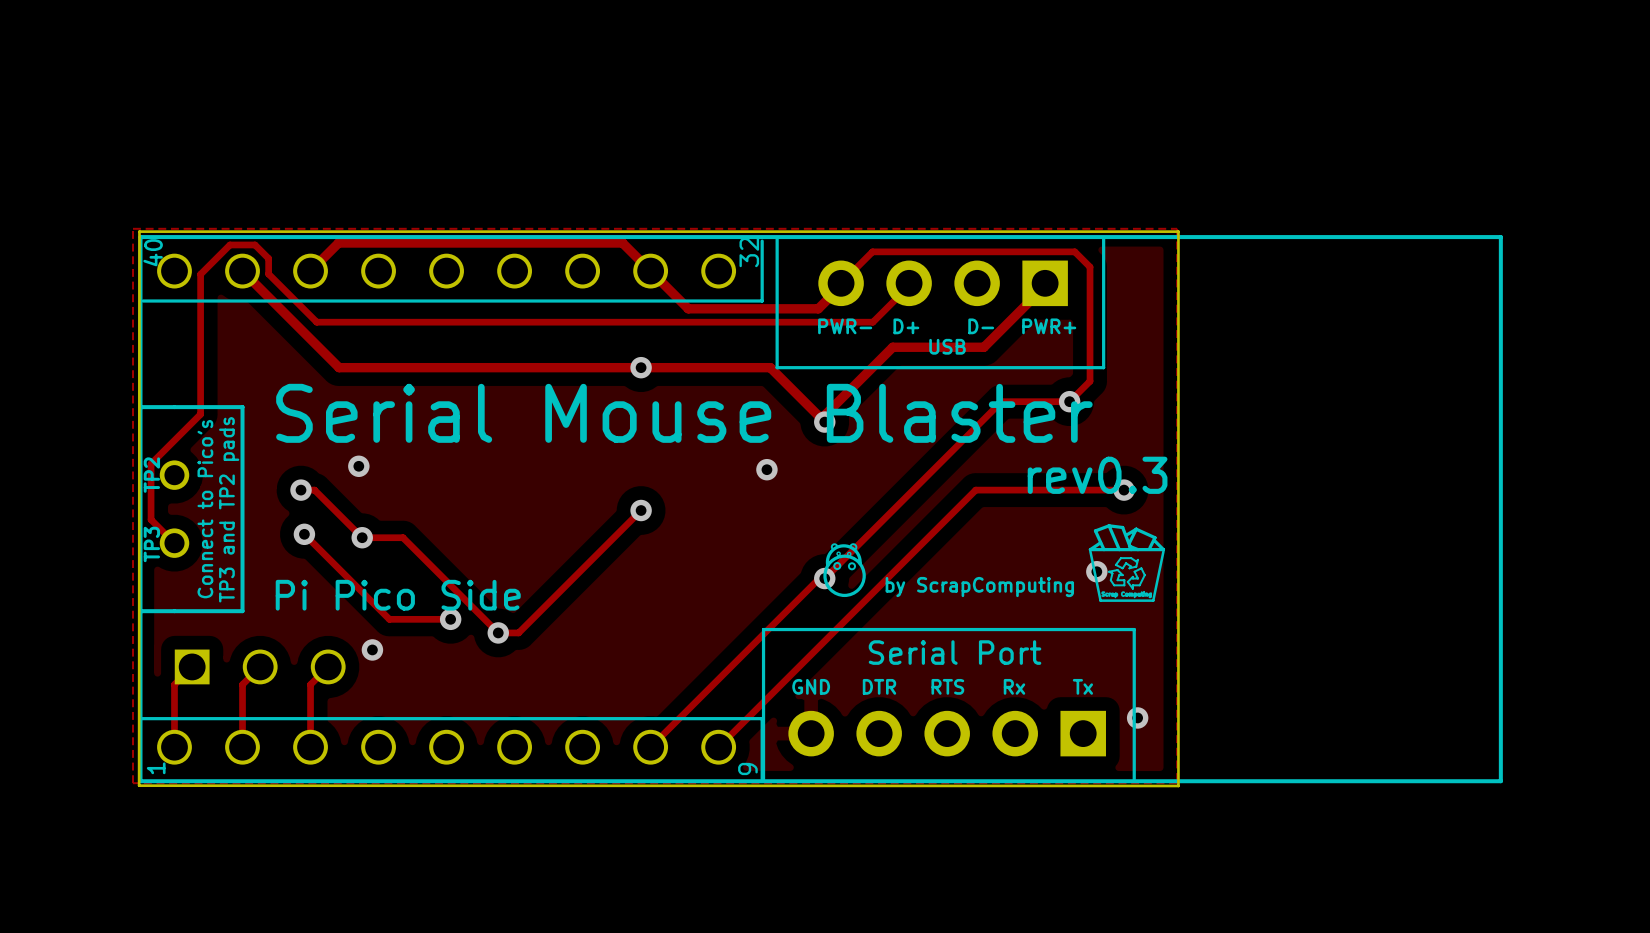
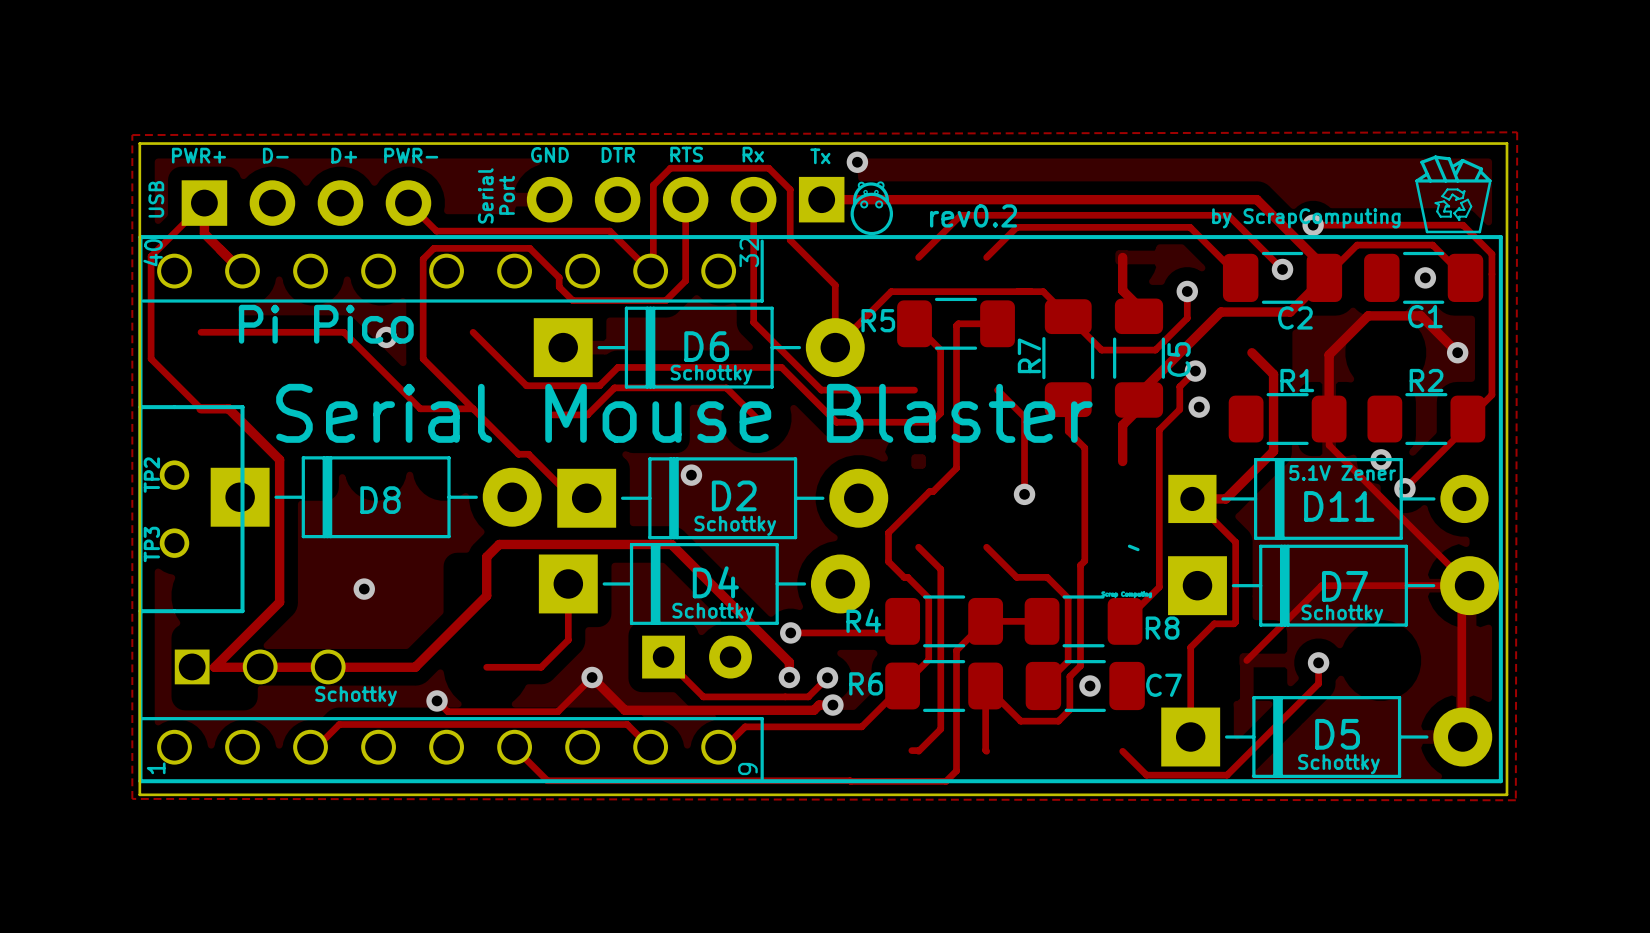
text: none -> PWR+ (198, 155)
text: none -> D- (275, 155)
via: none -> (857, 162)
drawing: none -> [860, 189, 884, 209]
text: none -> Serial (485, 195)
text: none -> Port (507, 195)
text: none -> USB (156, 199)
track: none -> (685, 199) (685, 280) (665, 300) (572, 300) (559, 287) (559, 277) (529, 248) (433, 248) (423, 259) (423, 358) (518, 454) (528, 454) (582, 507) (586, 507)
track: none -> (753, 199) (753, 322) (821, 390) (914, 390)
track: none -> (821, 199) (1256, 199) (1324, 267) (1324, 277)
track: none -> (408, 203) (436, 231) (609, 231) (653, 274) (653, 185) (670, 168) (768, 168) (790, 189) (790, 240) (835, 285) (835, 347) (891, 291) (1043, 291) (1101, 350) (1155, 350) (1187, 318) (1187, 291)
text: none -> rev0.2 (973, 215)
track: none -> (1313, 225) (1463, 225) (1491, 254) (1491, 394) (1467, 419) (1467, 425) (1404, 488)
via: none -> (1313, 225)
zone outline: (133, 228) (133, 783) (1177, 783) (1177, 228) (133, 228) -> (1517, 132) (132, 135) (132, 798) (1515, 800) (1517, 132)
board edge: (139, 231) (1178, 231) (1178, 785) (139, 785) (139, 231) -> (139, 143) (139, 794) (1506, 794) (1506, 143) (139, 143)
line: (777, 238) (777, 367) (1103, 367) (1103, 238) -> none
track: none -> (918, 257) (960, 215) (1228, 215) (1282, 269)
track: none -> (986, 257) (1016, 227) (1190, 227) (1240, 277)
track: none -> (1122, 257) (1122, 290) (1142, 310)
via: none -> (1282, 269)
track: (242, 271) (339, 367) (770, 367) (824, 422) (824, 415) (892, 347) (983, 347) (1045, 286) -> none
track: (310, 271) (338, 243) (622, 243) (688, 308) (818, 308) (841, 286) -> none
track: none -> (245, 274) (204, 233) (204, 203) (151, 256) (151, 358) (201, 408) (228, 408) (279, 459) (279, 602) (214, 667) (415, 667) (486, 595) (486, 557) (499, 544) (671, 544) (789, 662) (789, 677)
C2: none -> (1282, 277)
track: none -> (1324, 277) (1357, 245) (1432, 245) (1465, 277)
track: none -> (1324, 277) (1290, 312) (1220, 312) (1139, 393) (1139, 399)
C1: none -> (1423, 277)
via: none -> (1425, 277)
track: (841, 283) (872, 251) (1074, 251) (1090, 267) (1090, 381) (1069, 401) (1001, 401) (824, 578) (819, 578) (650, 747) -> none
part rotation: 0° (943, 283) -> 180° (306, 203)
part position: (943, 283) -> (306, 203)
track: (909, 286) (872, 322) (316, 322) (268, 274) (268, 258) (255, 244) (229, 244) (200, 274) (200, 414) (151, 463) (151, 519) (174, 543) -> none
via: none -> (1187, 291)
R5: none -> (956, 323)
track: none -> (997, 323) (958, 323) (956, 325) (956, 468) (933, 491) (929, 491) (888, 532) (888, 561) (928, 598) (928, 659) (861, 726) (745, 726) (721, 750)
text: none -> Pi Pico (326, 324)
track: none -> (914, 324) (940, 349) (940, 413) (931, 422) (836, 422) (781, 367) (617, 367) (599, 385) (526, 385) (473, 332)
text position: PWR- (845, 326) -> PWR- (411, 155)
text position: D+ (906, 326) -> D+ (344, 155)
text: D- (981, 326) -> none
text: PWR+ (1049, 326) -> none
track: none -> (201, 332) (343, 332) (420, 408) (473, 408)
via: none -> (386, 337)
text: USB (947, 346) -> none
D6: none -> (699, 347)
track: none -> (1251, 352) (1273, 374) (1273, 451) (1225, 498) (1192, 498) (1235, 542) (1235, 622) (1233, 623) (1214, 623) (1190, 647) (1190, 737) (1178, 737)
track: none -> (1457, 352) (1420, 315) (1368, 315) (1329, 354) (1329, 445) (1469, 585)
via: none -> (1457, 352)
R7: none -> (1068, 358)
C5: none -> (1139, 358)
via: (641, 367) -> none
track: none -> (1198, 367) (1179, 386) (1179, 409) (1159, 429) (1159, 587) (1125, 621)
via: none -> (1195, 371)
text: none -> Schottky (711, 374)
track: none -> (997, 390) (1024, 417) (1024, 494)
track: none -> (1068, 399) (1068, 431) (1084, 447) (1084, 561) (1080, 565) (1080, 665) (1069, 676) (1069, 709) (1058, 721) (1020, 721) (985, 685) (986, 751)
via: (1069, 401) -> none
track: none -> (1143, 404) (1122, 425) (1122, 461)
via: none -> (1199, 407)
track: none -> (553, 414) (587, 414) (614, 387) (726, 387) (756, 418)
R1: none -> (1287, 419)
R2: none -> (1426, 419)
via: (824, 422) -> none
via: none -> (1381, 459)
via: (358, 466) -> none
via: (766, 469) -> none
text: none -> 5.1V Zener (1342, 472)
via: none -> (691, 475)
text: rev0.3 (1097, 475) -> none
via: none -> (1404, 488)
track: (301, 490) (314, 490) (362, 537) (403, 537) (498, 632) (518, 632) (641, 510) -> none
via: (301, 490) -> none
track: (1124, 490) (975, 490) (718, 747) -> none
via: (1124, 490) -> none
via: none -> (1024, 494)
D8: none -> (376, 497)
D2: none -> (722, 498)
D11: none -> (1328, 498)
text: Connect to Pico's (205, 509) -> none
text: TP3 and TP2 pads (229, 509) -> none
via: (641, 510) -> none
text: none -> Schottky (735, 525)
line: (1109, 525) (1119, 549) -> (1435, 157) (1445, 180)
line: (1109, 525) (1122, 527) (1131, 549) -> (1435, 157) (1449, 158) (1457, 180)
line: (1109, 525) (1095, 530) (1103, 549) -> (1435, 157) (1421, 162) (1430, 180)
line: (1136, 529) (1154, 537) (1149, 547) -> (1462, 160) (1481, 169) (1476, 179)
line: (1136, 529) (1129, 542) -> (1462, 160) (1455, 174)
line: (1136, 529) (1127, 534) -> (1462, 160) (1454, 165)
track: (301, 530) (389, 619) (450, 619) -> none
via: (304, 534) -> none
via: (362, 537) -> none
line: (1154, 541) (1163, 549) (1090, 549) (1100, 542) -> (1481, 172) (1489, 180) (1416, 180) (1427, 174)
line: (837, 546) (833, 544) (832, 548) -> (864, 185) (860, 182) (859, 187)
line: (850, 547) (852, 544) (854, 544) (856, 547) (854, 549) -> (877, 185) (878, 182) (882, 182) (883, 185) (881, 188)
track: none -> (918, 547) (940, 569) (940, 729) (918, 751)
track: none -> (986, 547) (1016, 577) (1047, 577) (1068, 598) (1068, 661) (1043, 685)
drawing: [833, 551, 856, 571] -> none
line: (1090, 551) (1100, 600) (1153, 600) (1163, 551) -> (1416, 182) (1427, 231) (1479, 231) (1489, 182)
line: (1120, 558) (1131, 558) (1136, 561) (1137, 559) (1136, 566) (1129, 568) (1131, 566) (1126, 563) (1122, 568) (1115, 564) (1120, 558) -> (1447, 189) (1457, 189) (1462, 192) (1464, 191) (1462, 197) (1455, 199) (1457, 197) (1452, 194) (1449, 199) (1442, 196) (1447, 189)
line: (860, 563) (856, 551) (851, 547) (843, 545) (831, 551) (827, 558) (827, 564) -> (887, 201) (886, 195) (882, 188) (870, 183) (858, 189) (855, 196) (854, 203)
line: (1141, 568) (1144, 575) (1139, 585) (1132, 585) (1132, 588) (1127, 581) (1132, 576) (1132, 578) (1137, 578) (1134, 571) (1141, 568) -> (1467, 199) (1471, 206) (1466, 216) (1459, 216) (1459, 220) (1454, 213) (1459, 208) (1459, 209) (1464, 209) (1461, 203) (1467, 199)
line: (1117, 570) (1109, 571) (1112, 573) (1110, 580) (1114, 585) (1124, 585) (1124, 580) (1117, 580) (1119, 575) (1122, 575) (1117, 570) -> (1444, 201) (1435, 203) (1438, 204) (1437, 211) (1440, 216) (1450, 216) (1450, 211) (1444, 211) (1445, 206) (1449, 206) (1444, 201)
via: (1096, 571) -> none
drawing position: (844, 575) -> (871, 213)
via: (824, 578) -> none
track: none -> (568, 583) (568, 640) (541, 667) (486, 667)
D4: none -> (704, 583)
track: none -> (1461, 583) (1461, 735) (1462, 737) (1462, 592) (1469, 585)
D7: none -> (1333, 585)
track: none -> (1469, 585) (1321, 585) (1246, 660)
text position: by ScrapComputing (979, 587) -> by ScrapComputing (1306, 218)
via: none -> (364, 589)
text: Pi Pico Side (398, 595) -> none
text: none -> Schottky (713, 612)
text: none -> Schottky (1342, 614)
via: (450, 619) -> none
track: none -> (902, 621) (891, 632) (790, 632)
R4: none -> (944, 621)
track: none -> (1042, 621) (985, 621) (956, 650) (956, 770) (946, 781) (547, 780) (517, 750)
R8: none -> (1083, 621)
via: (498, 632) -> none
via: none -> (790, 632)
via: (372, 649) -> none
text: Serial Port (955, 652) -> none
track: none -> (663, 657) (703, 696) (808, 696) (827, 677)
part: none -> (697, 657)
track: none -> (1318, 662) (1318, 683) (1227, 775) (1146, 775) (1122, 751)
via: none -> (1318, 662)
track: (192, 666) (174, 684) (174, 747) -> none
track: (260, 666) (242, 684) (242, 747) -> none
track: (328, 666) (310, 684) (310, 747) -> none
via: none -> (592, 677)
via: none -> (789, 677)
via: none -> (827, 677)
R6: none -> (944, 685)
C7: none -> (1085, 685)
via: none -> (1090, 685)
text position: GND (811, 686) -> GND (549, 154)
text position: DTR (879, 686) -> DTR (618, 154)
text position: RTS (947, 686) -> RTS (686, 154)
text position: Rx (1014, 686) -> Rx (753, 154)
text position: Tx (1082, 686) -> Tx (820, 156)
text: none -> Schottky (356, 696)
track: none -> (437, 700) (447, 711) (557, 711) (592, 677) (624, 710) (813, 710) (819, 705) (832, 705)
via: none -> (437, 700)
via: none -> (832, 705)
via: (1137, 717) -> none
part position: (947, 733) -> (685, 199)
D5: none -> (1326, 737)
track: none -> (313, 750) (339, 724) (627, 724) (653, 750)
track: none -> (911, 750) (918, 750)
text: none -> Schottky (1338, 764)
line: (763, 781) (763, 629) (1134, 629) (1134, 781) -> none

